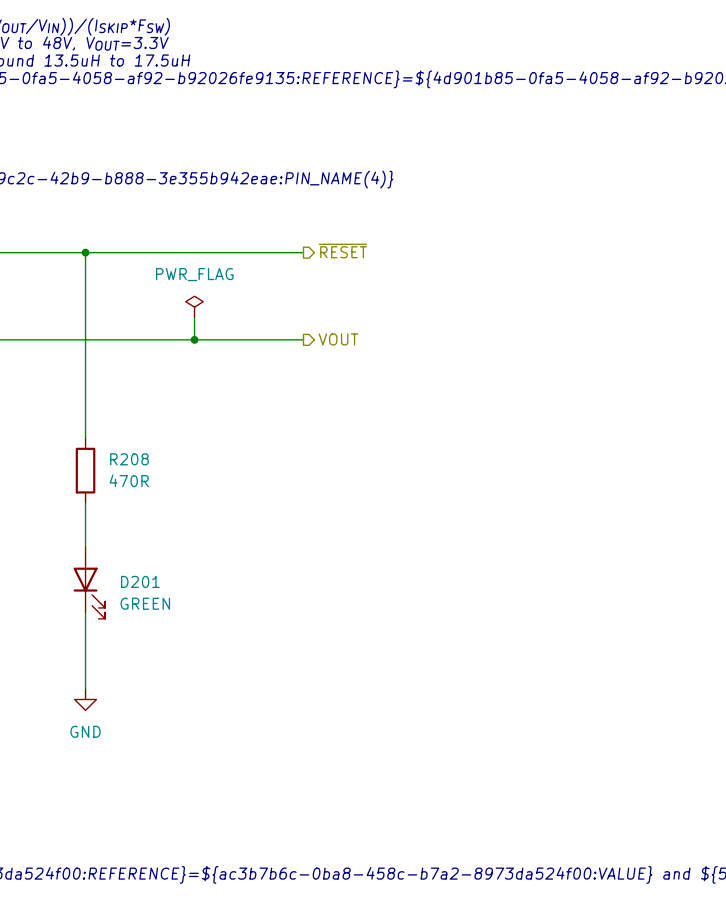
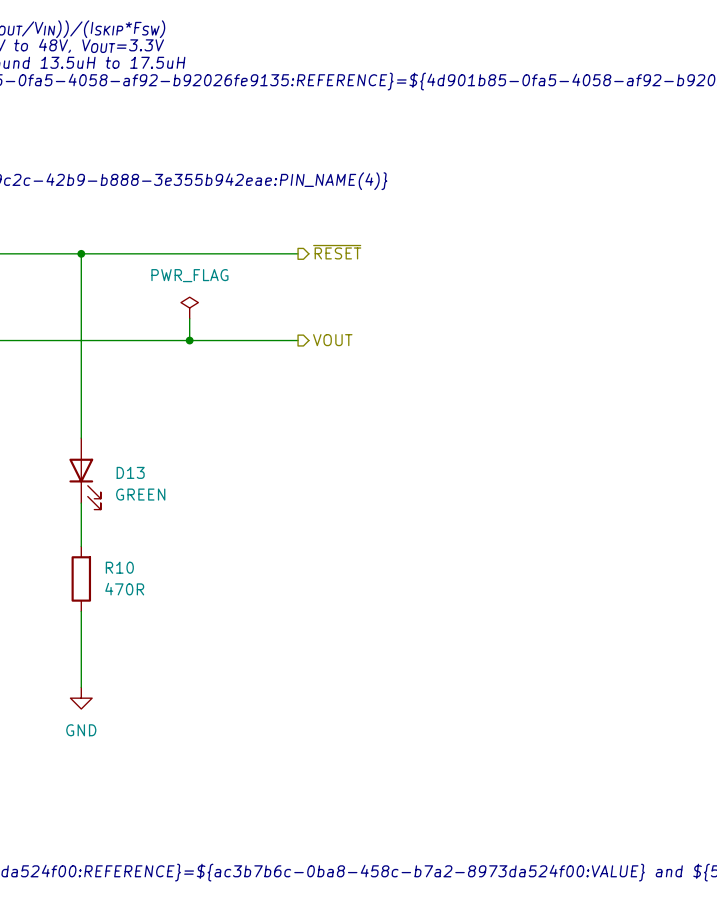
R208: 470R (85, 470) -> none
D13: none -> GREEN (85, 473)
R10: none -> 470R (81, 578)
D201: GREEN (89, 582) -> none

